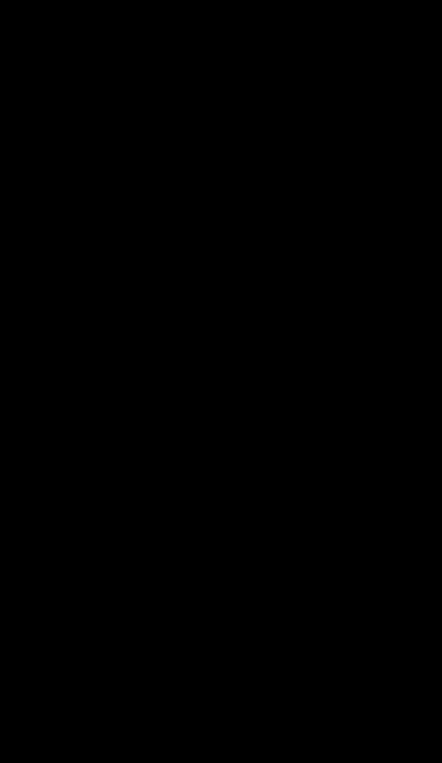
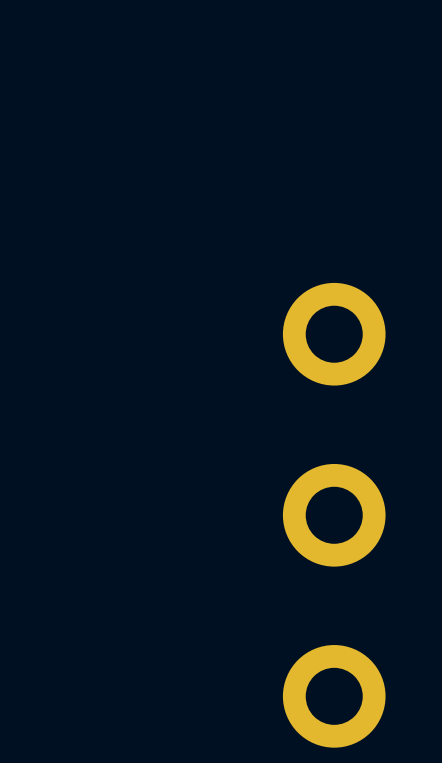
part: none -> (334, 515)

